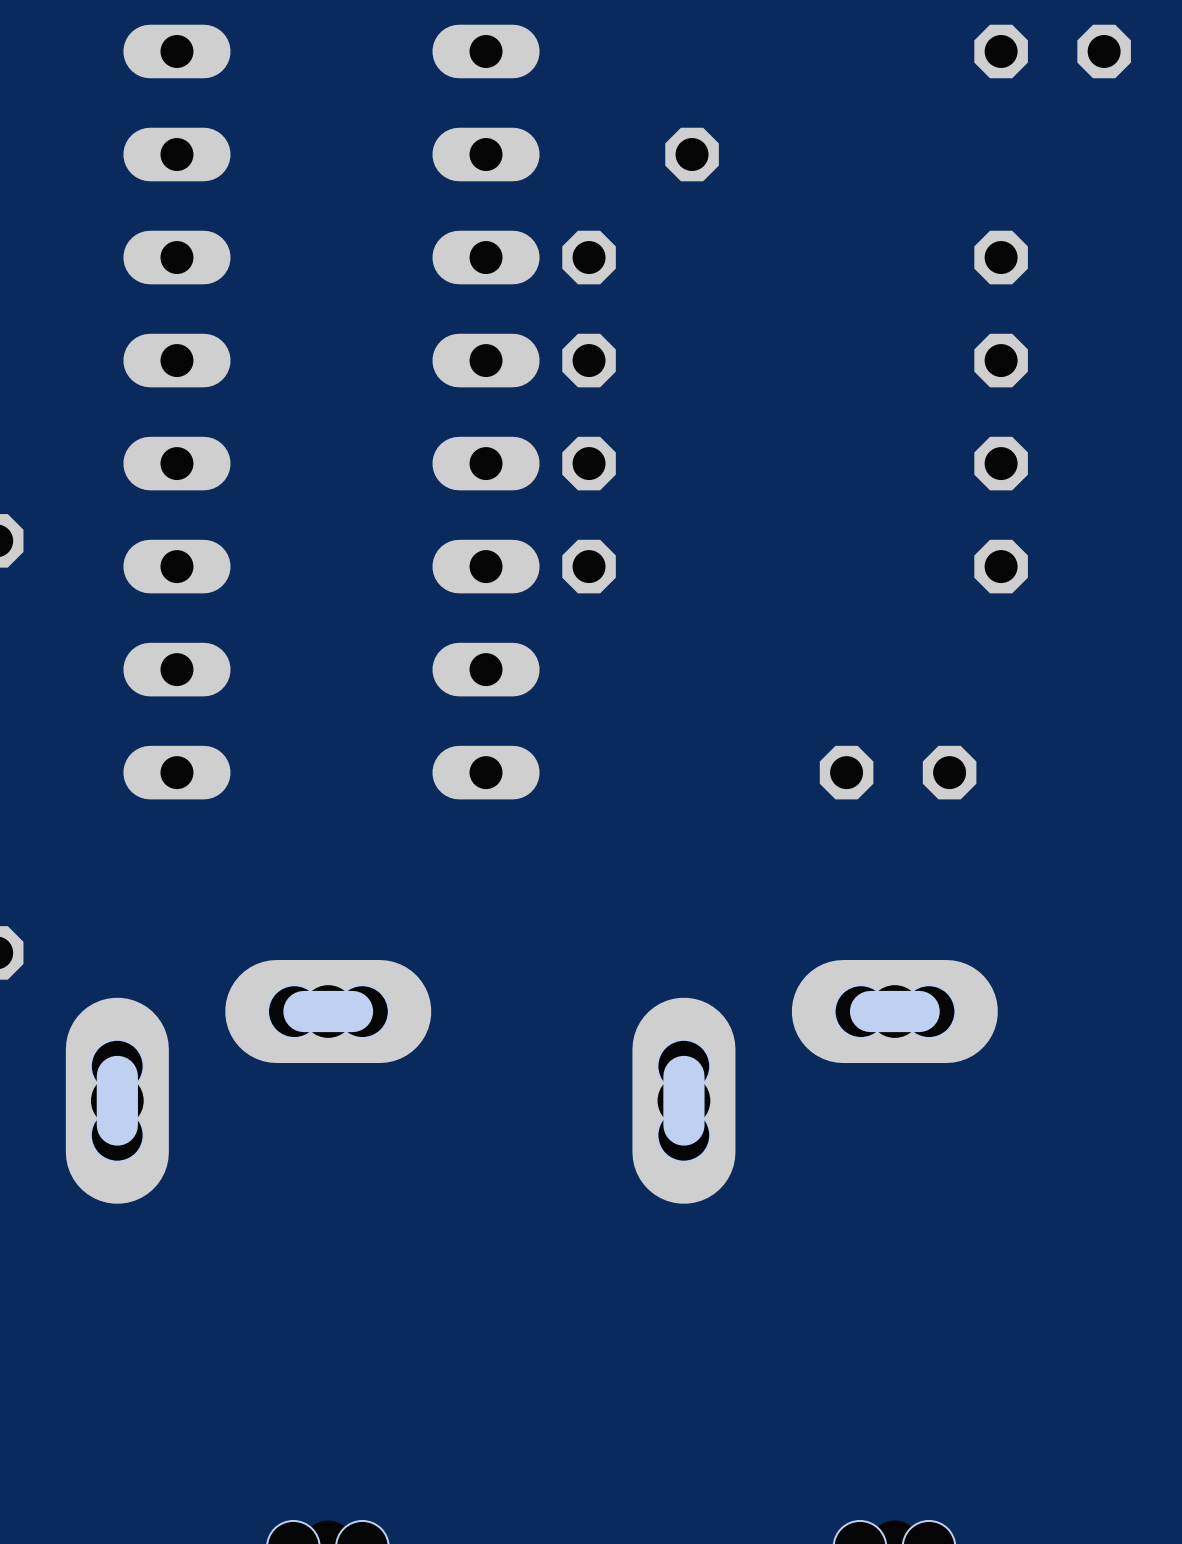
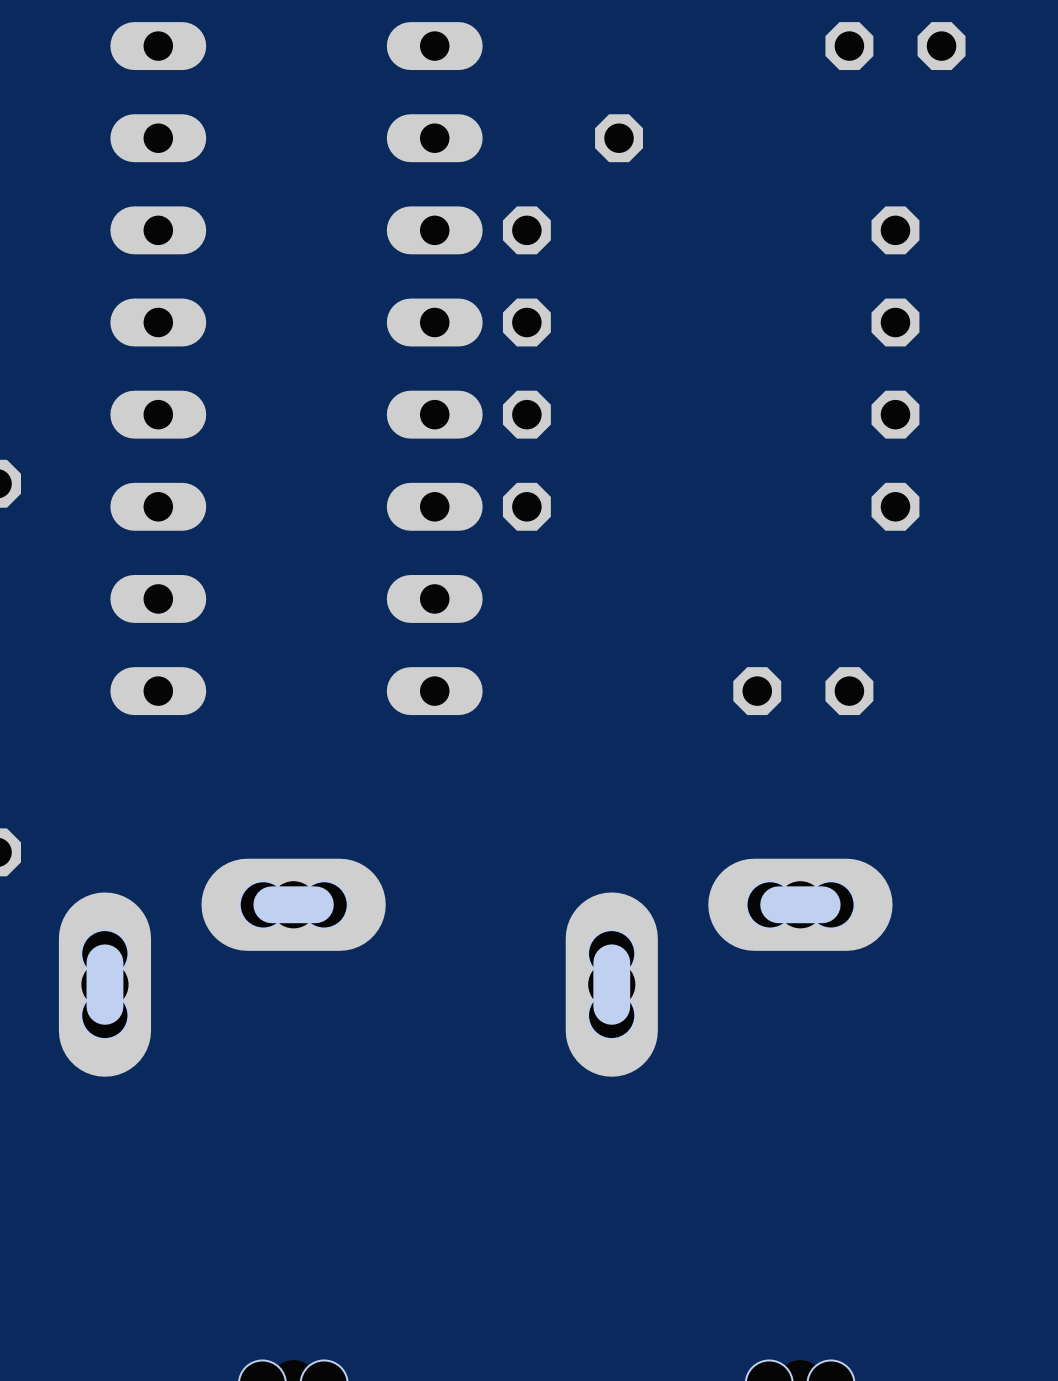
part position: (1052, 51) -> (895, 46)

